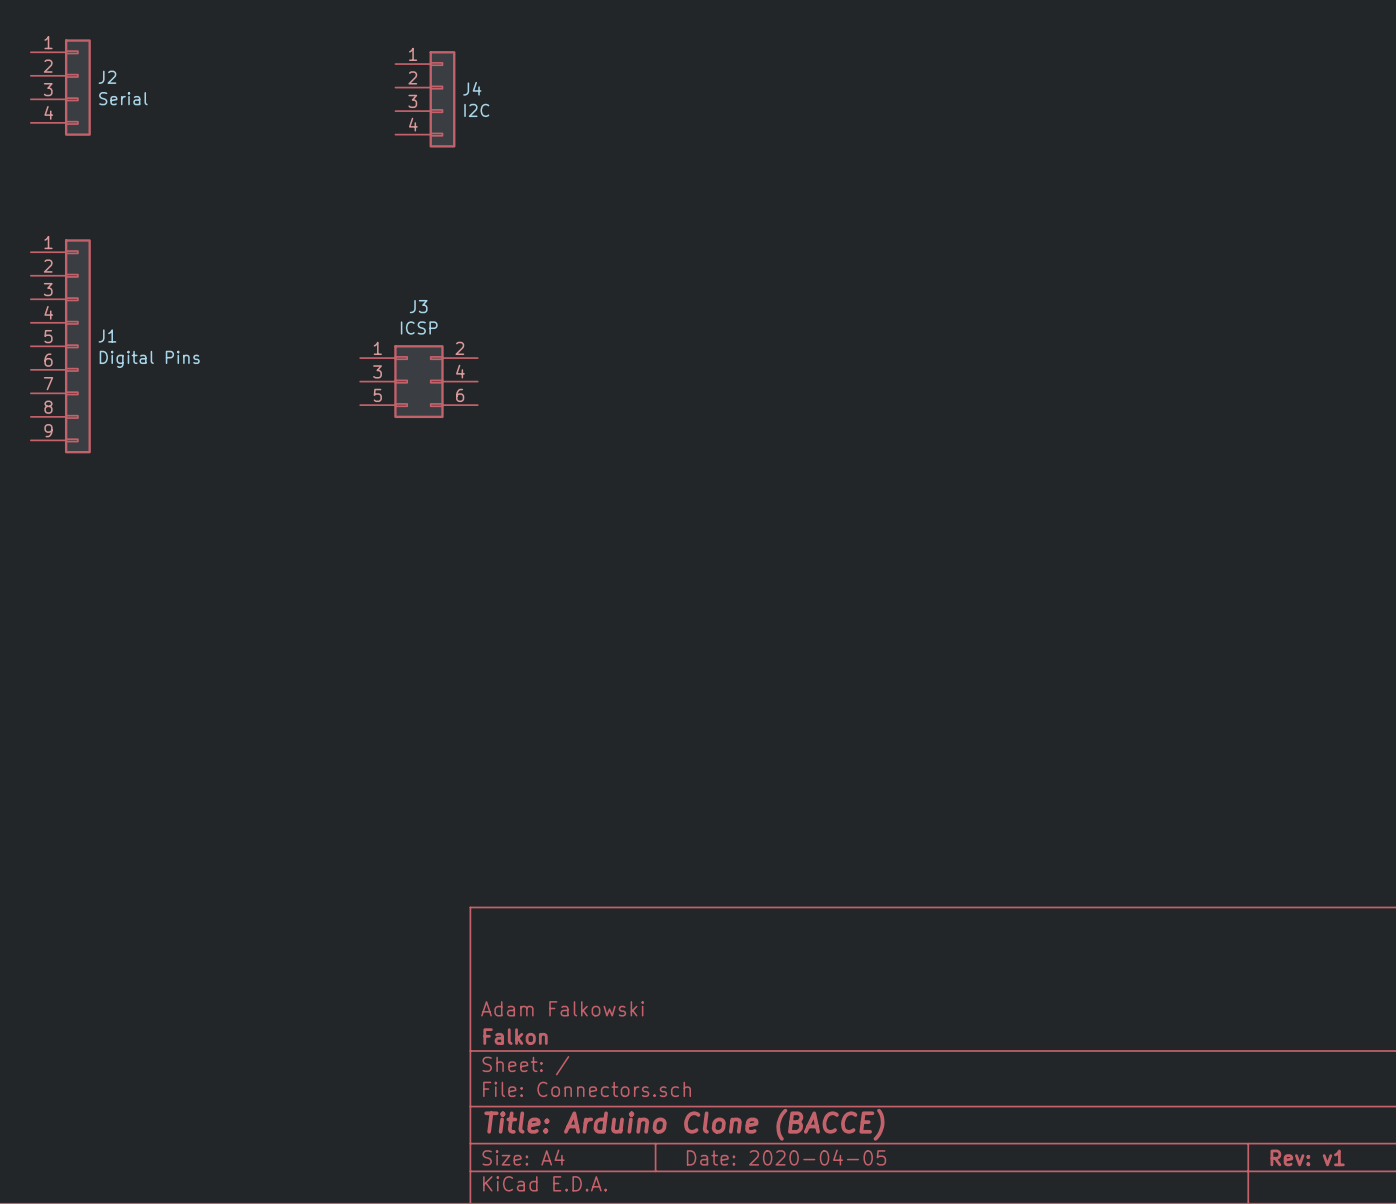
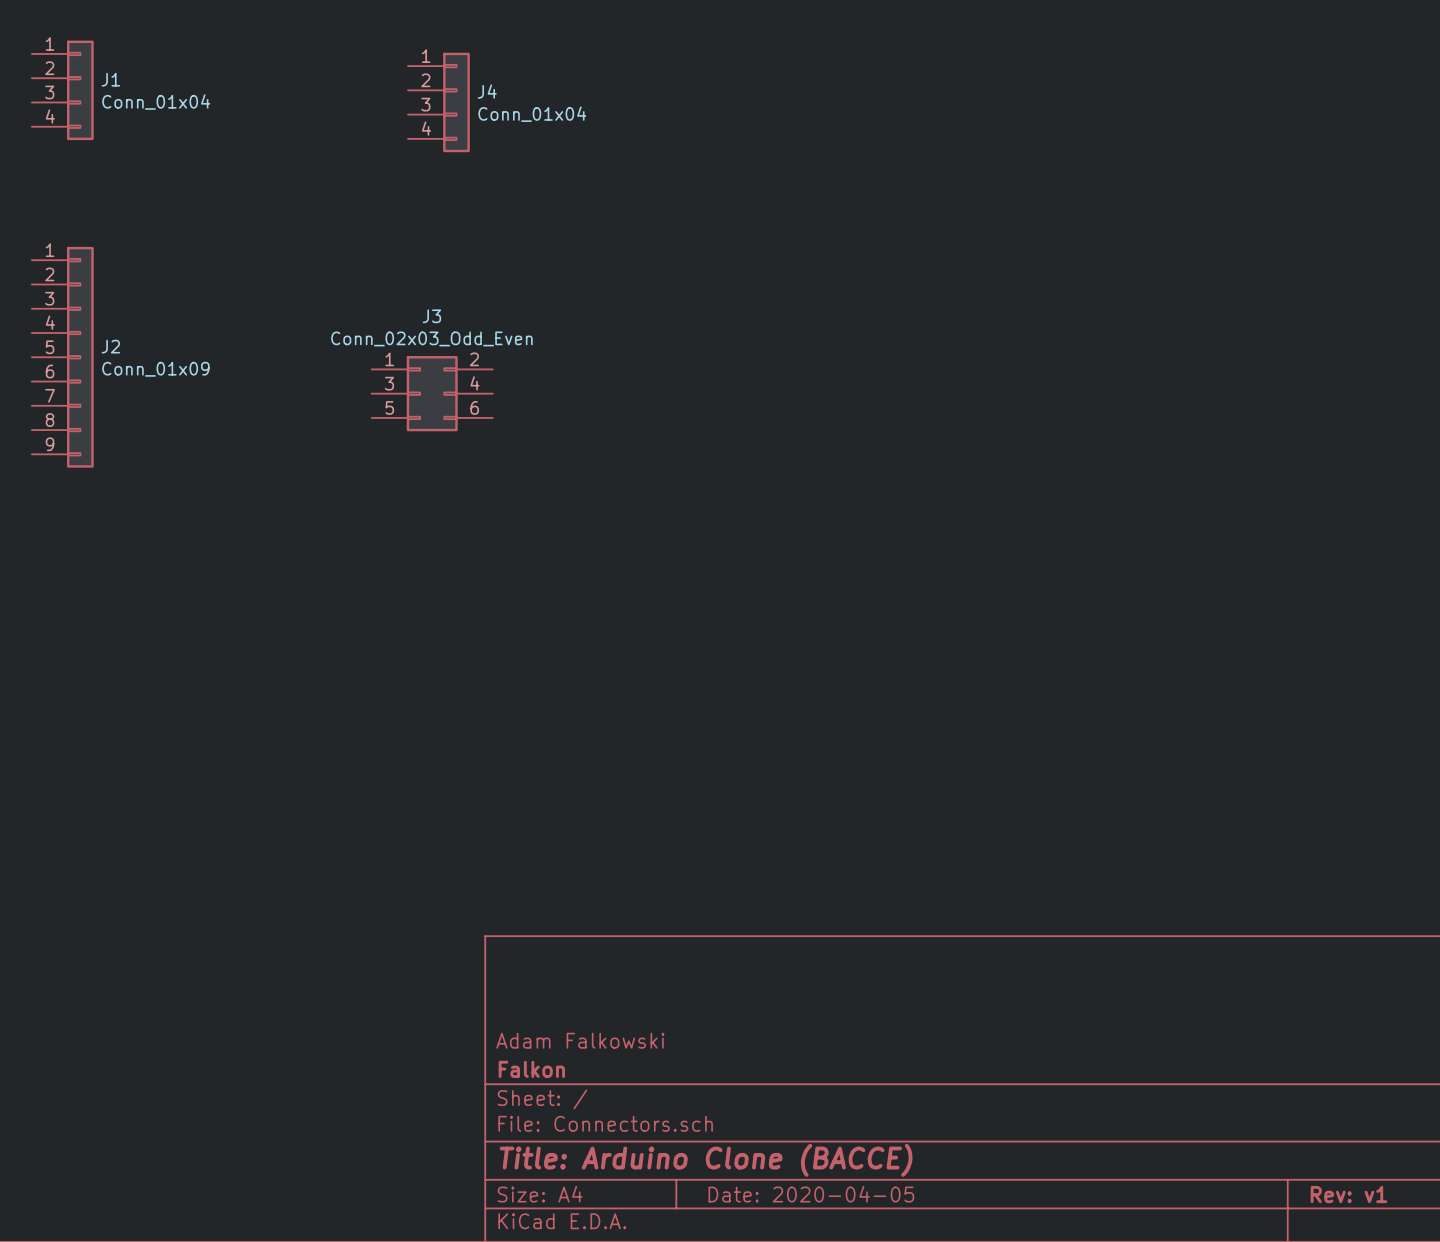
J2 name: J2 (107, 77) -> J1 (110, 79)
J2 value: Serial (123, 98) -> Conn_01x04 (156, 102)
J4 value: I2C (476, 110) -> Conn_01x04 (532, 114)
J3 value: ICSP (419, 327) -> Conn_02x03_Odd_Even (431, 338)
J1 name: J1 (107, 335) -> J2 (110, 346)
J1 value: Digital Pins (149, 359) -> Conn_01x09 (155, 369)

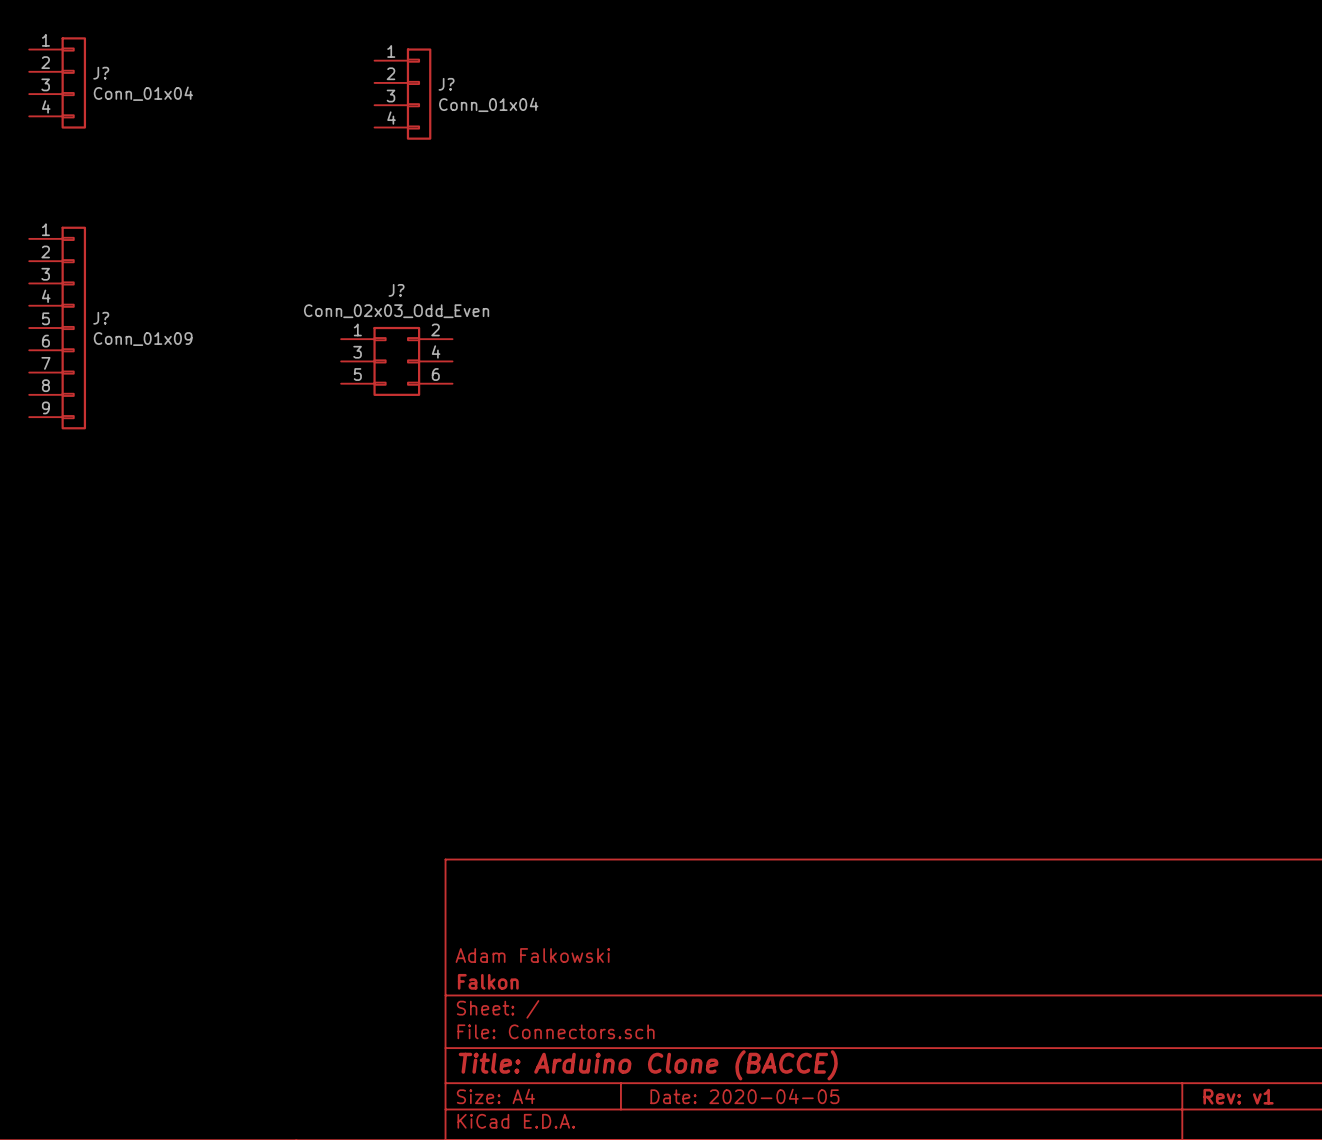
J1 name: J1 (110, 79) -> J? (101, 73)
J4 name: J4 (487, 91) -> J? (446, 84)
J3 name: J3 (431, 316) -> J? (396, 290)
J2 name: J2 (110, 346) -> J? (101, 318)

